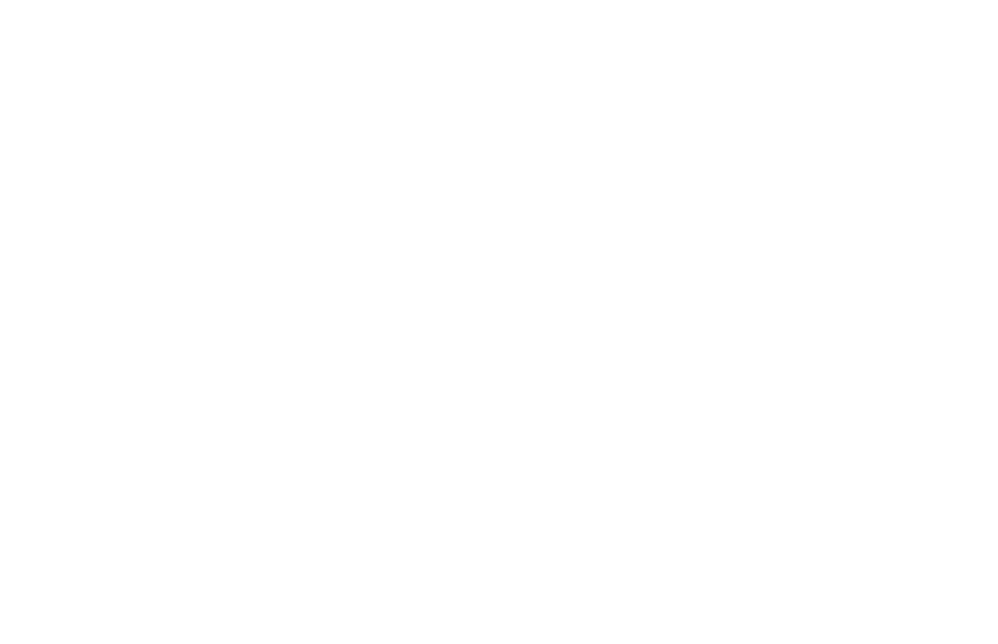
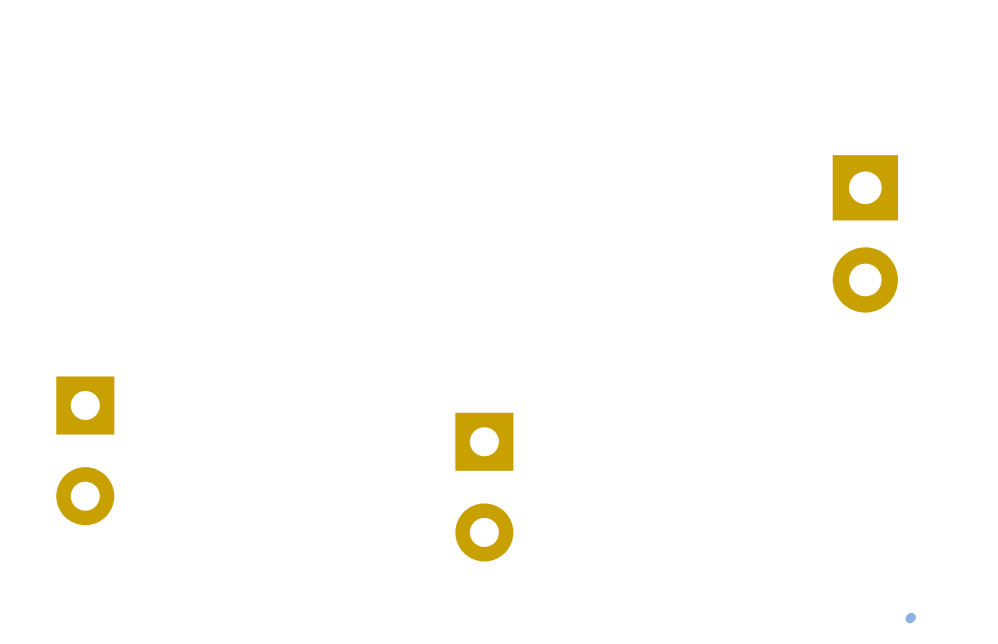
part: none -> (865, 233)
part: none -> (85, 450)
part: none -> (484, 487)
track: none -> (911, 617) (909, 618)

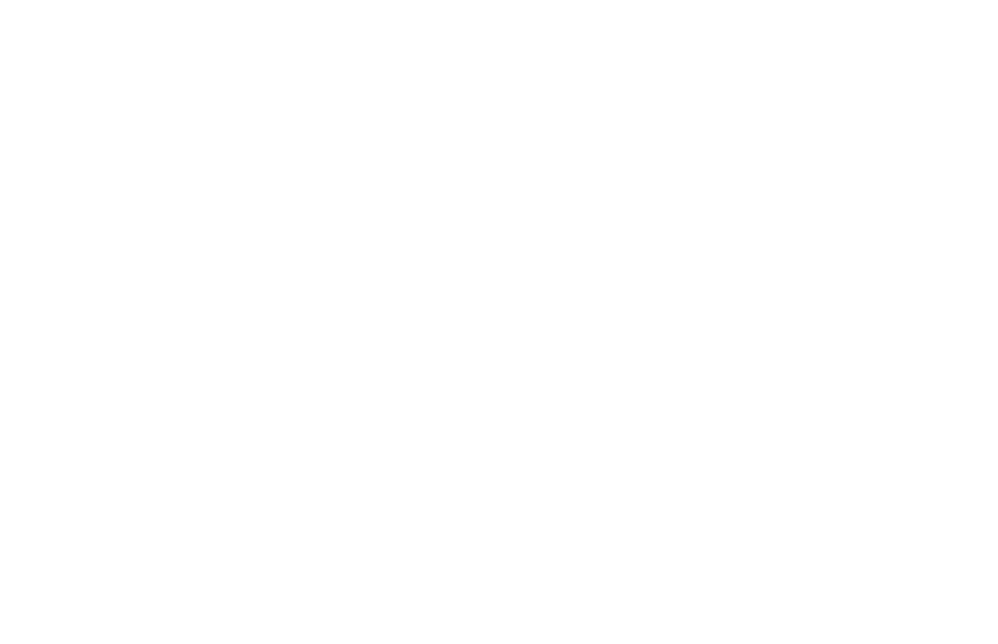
part: (865, 233) -> none
part: (85, 450) -> none
part: (484, 487) -> none
track: (911, 617) (909, 618) -> none

